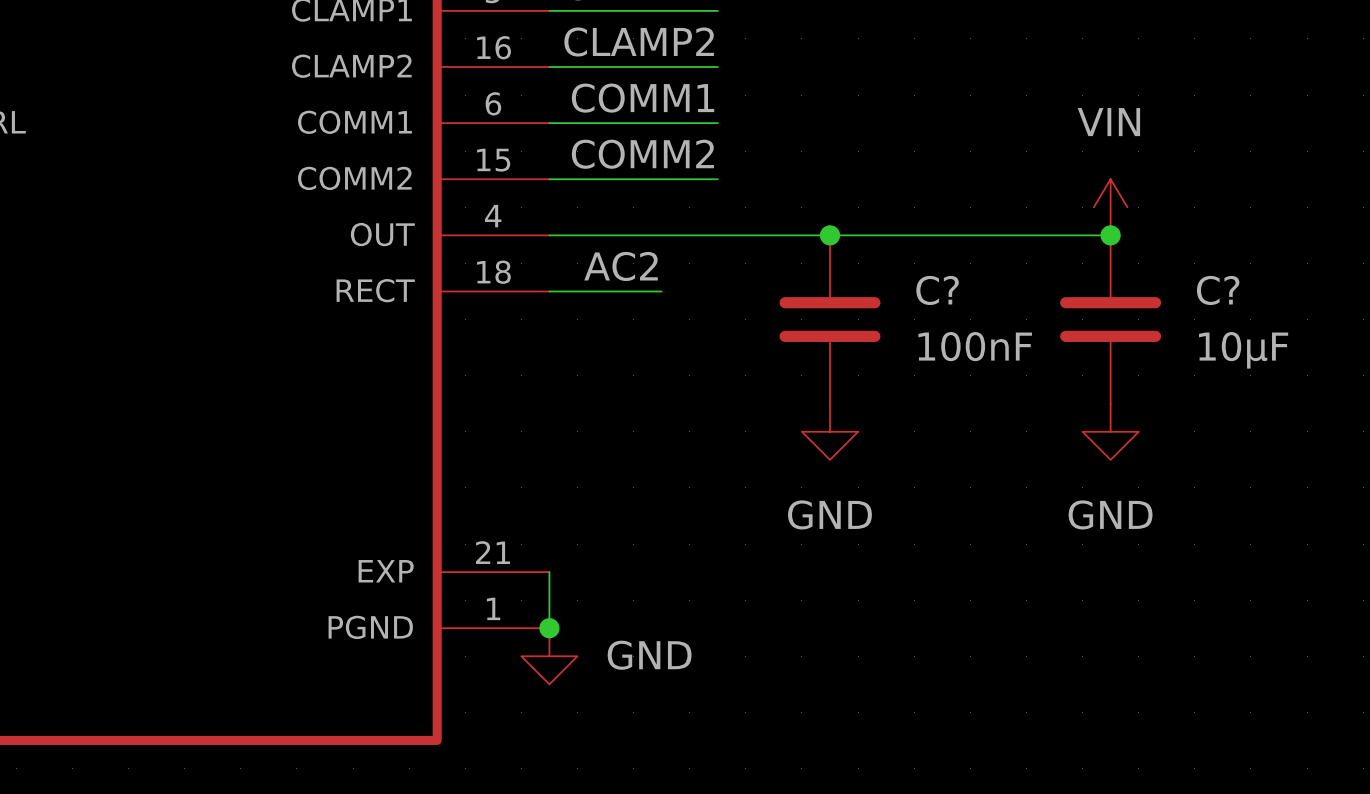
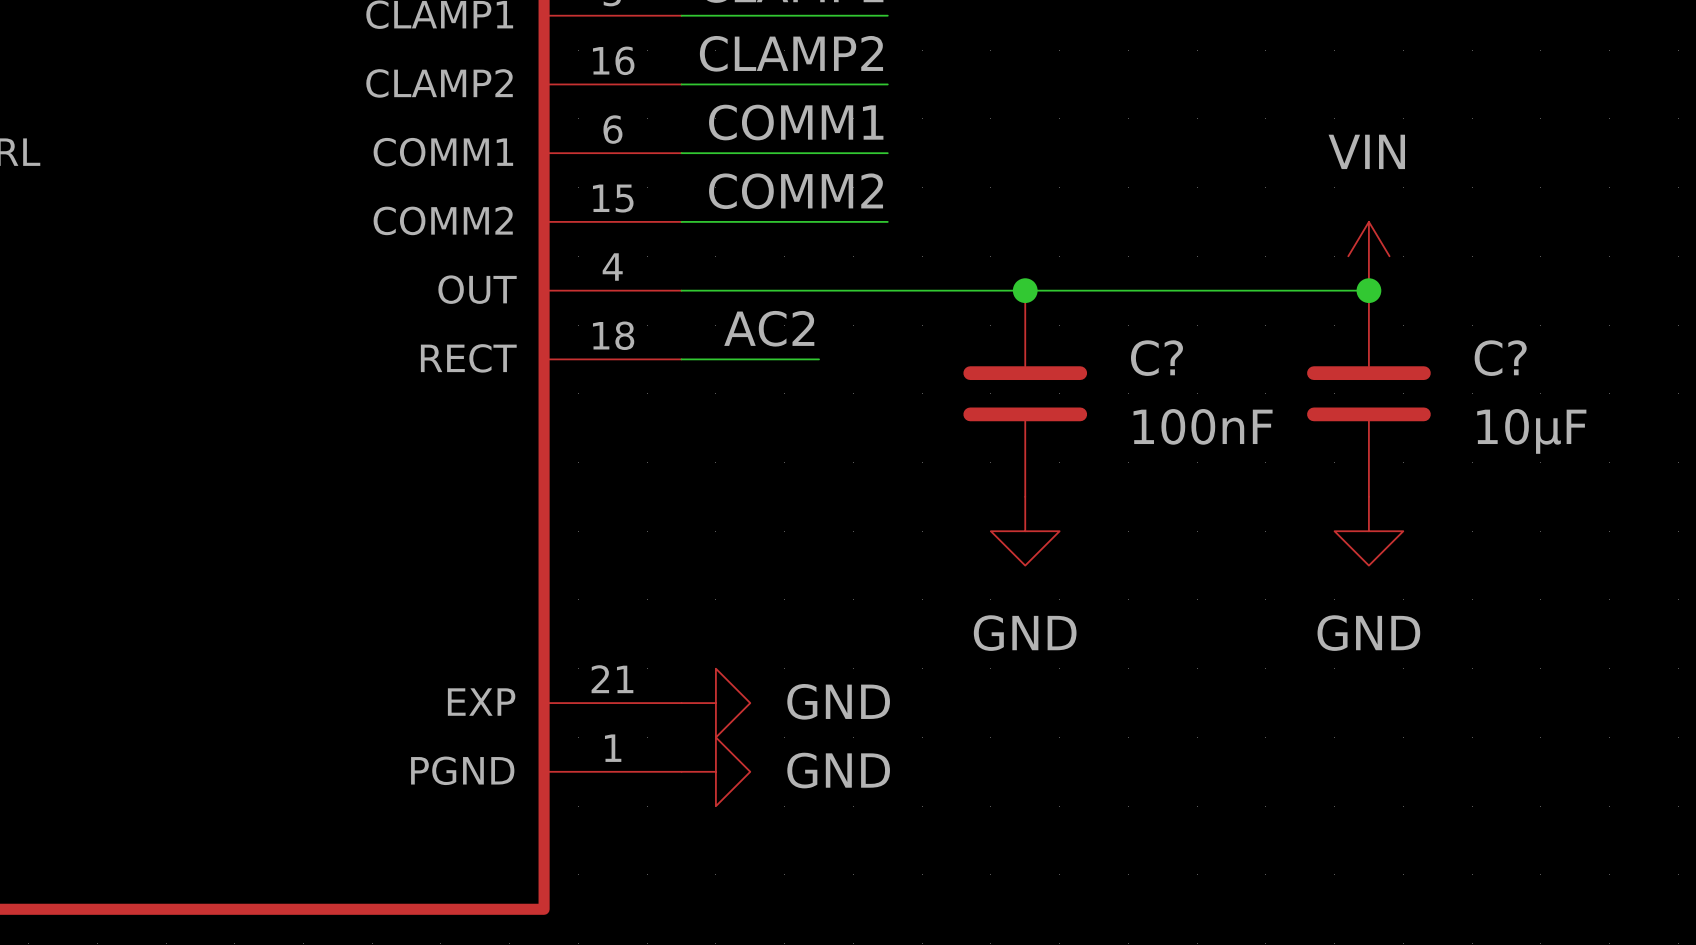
wire: (549, 572) (549, 628) -> none
power symbol: none -> GND (715, 703)
junction: (549, 628) -> none
power symbol rotation: 0° (549, 656) -> 90° counterclockwise (715, 771)
power symbol position: GND (549, 656) -> GND (715, 771)

